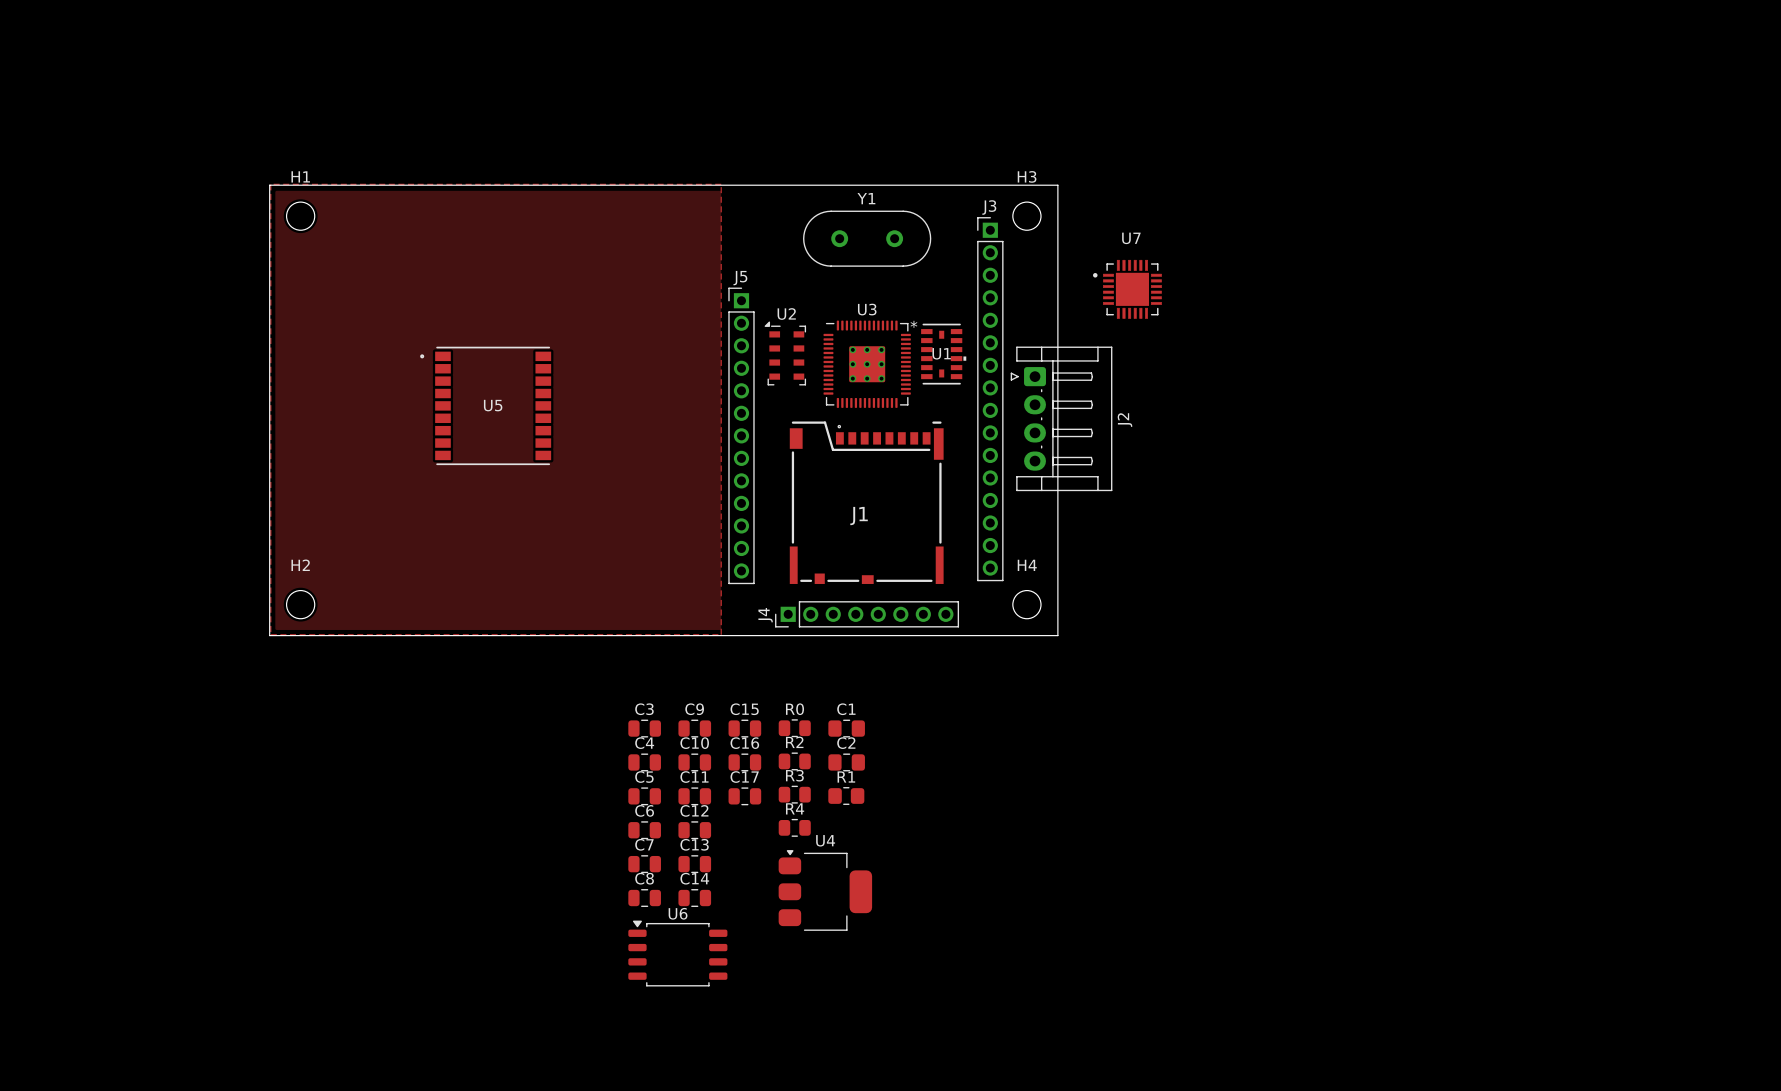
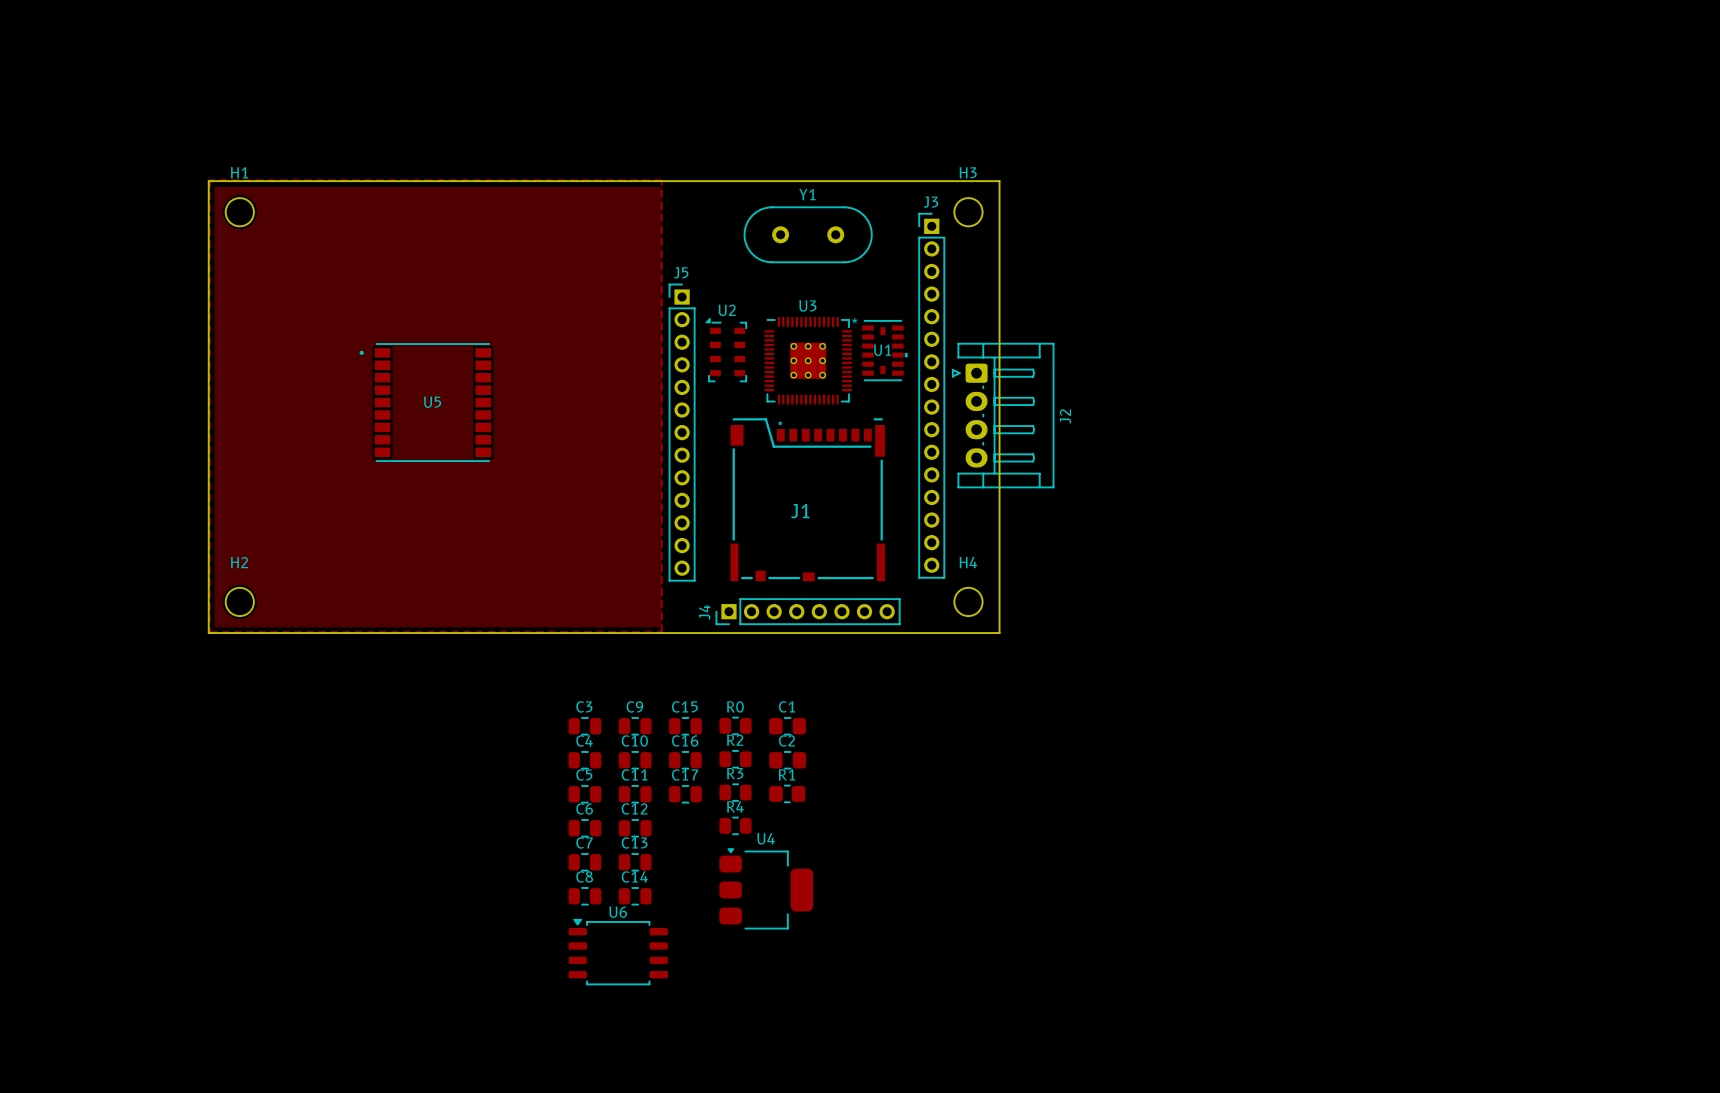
U7: (1127, 289) -> none

